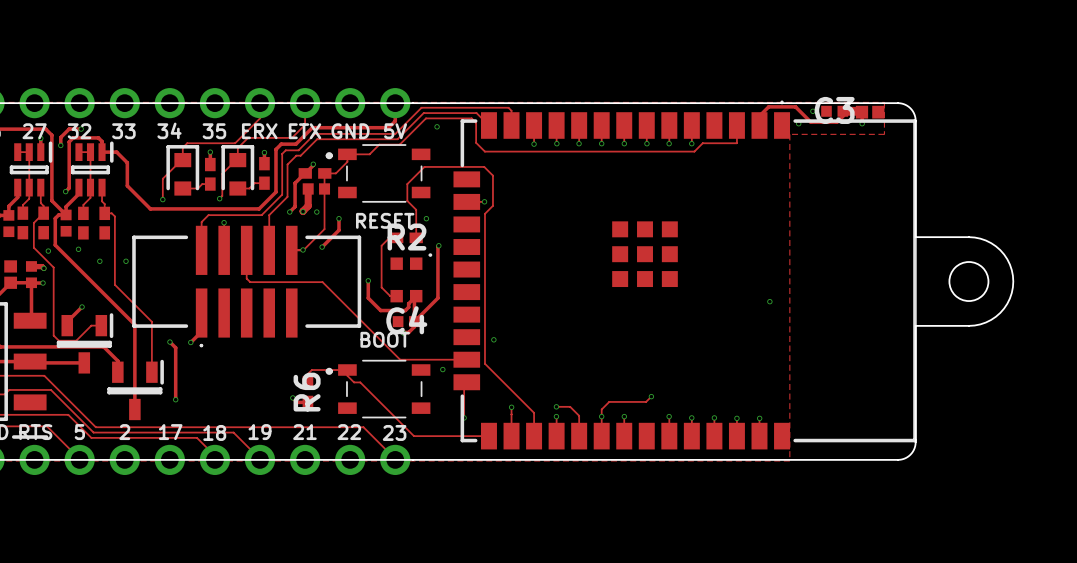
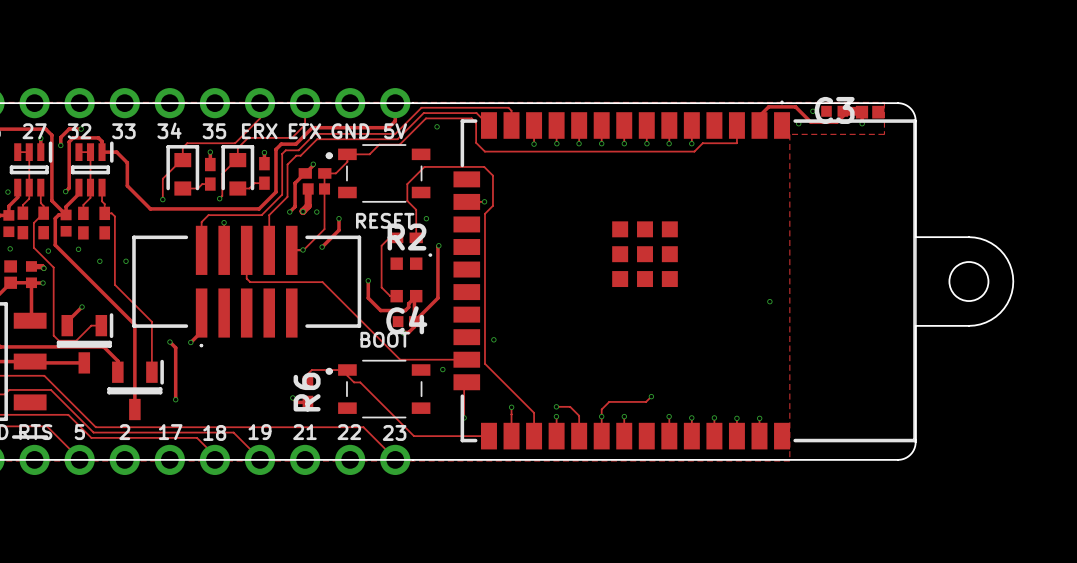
via: none -> (7, 192)
via: none -> (10, 248)

